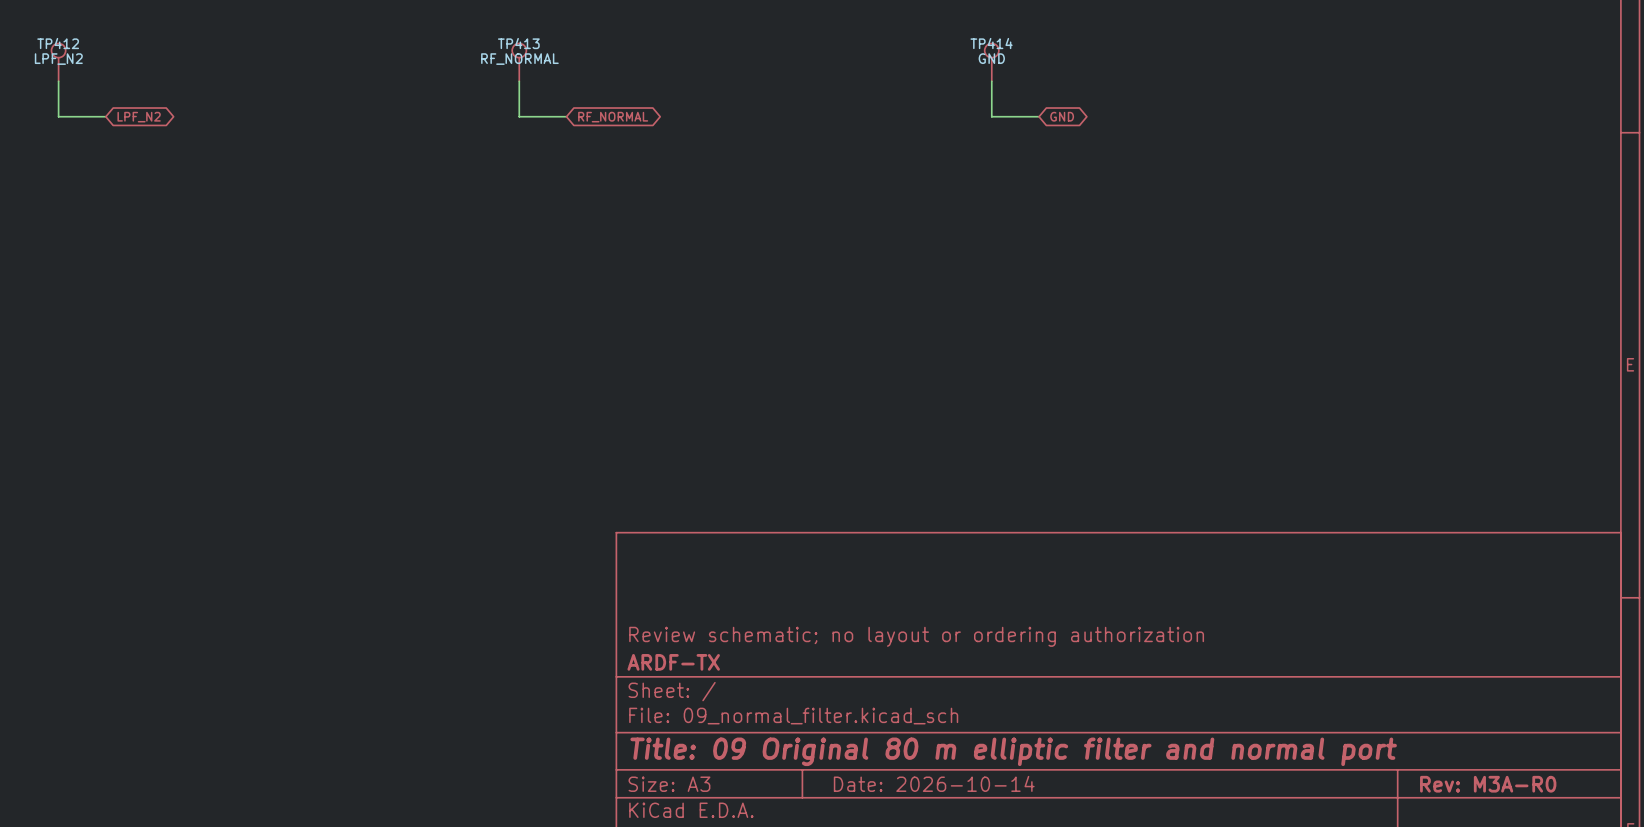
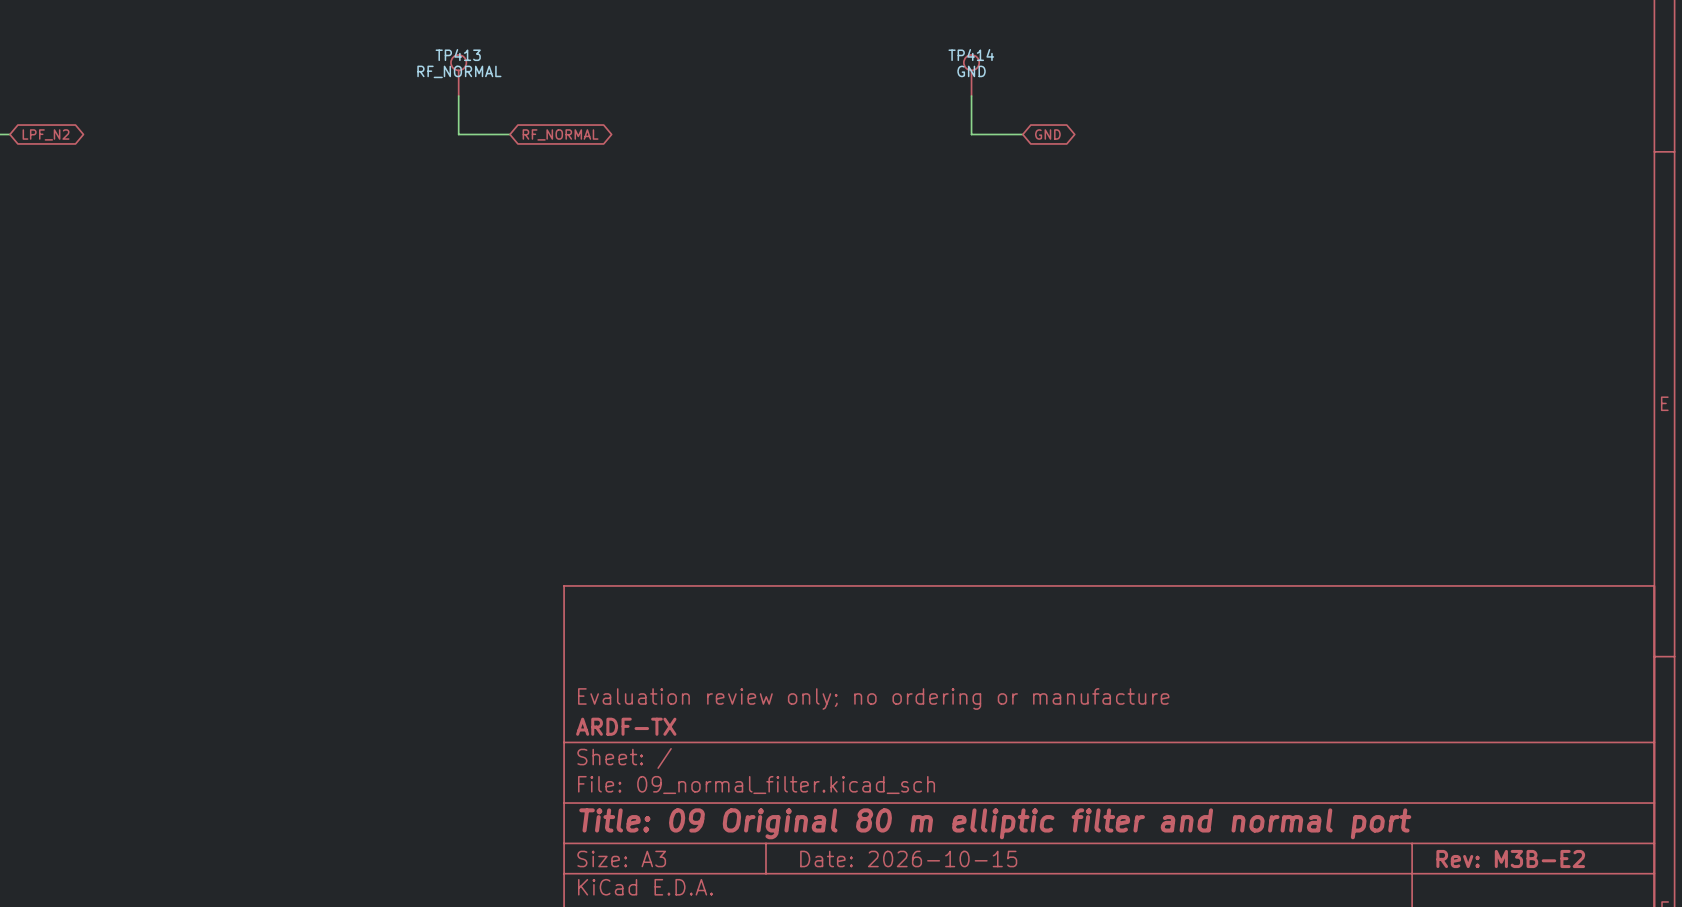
title block: Review schematic; no layout or ordering authorization (916, 636) -> Evaluation review only; no ordering or manufacture (873, 698)
title block: Date: 2026-10-14 (934, 783) -> Date: 2026-10-15 (908, 858)
title block: Rev: M3A-R0 (1488, 784) -> Rev: M3B-E2 (1510, 858)

